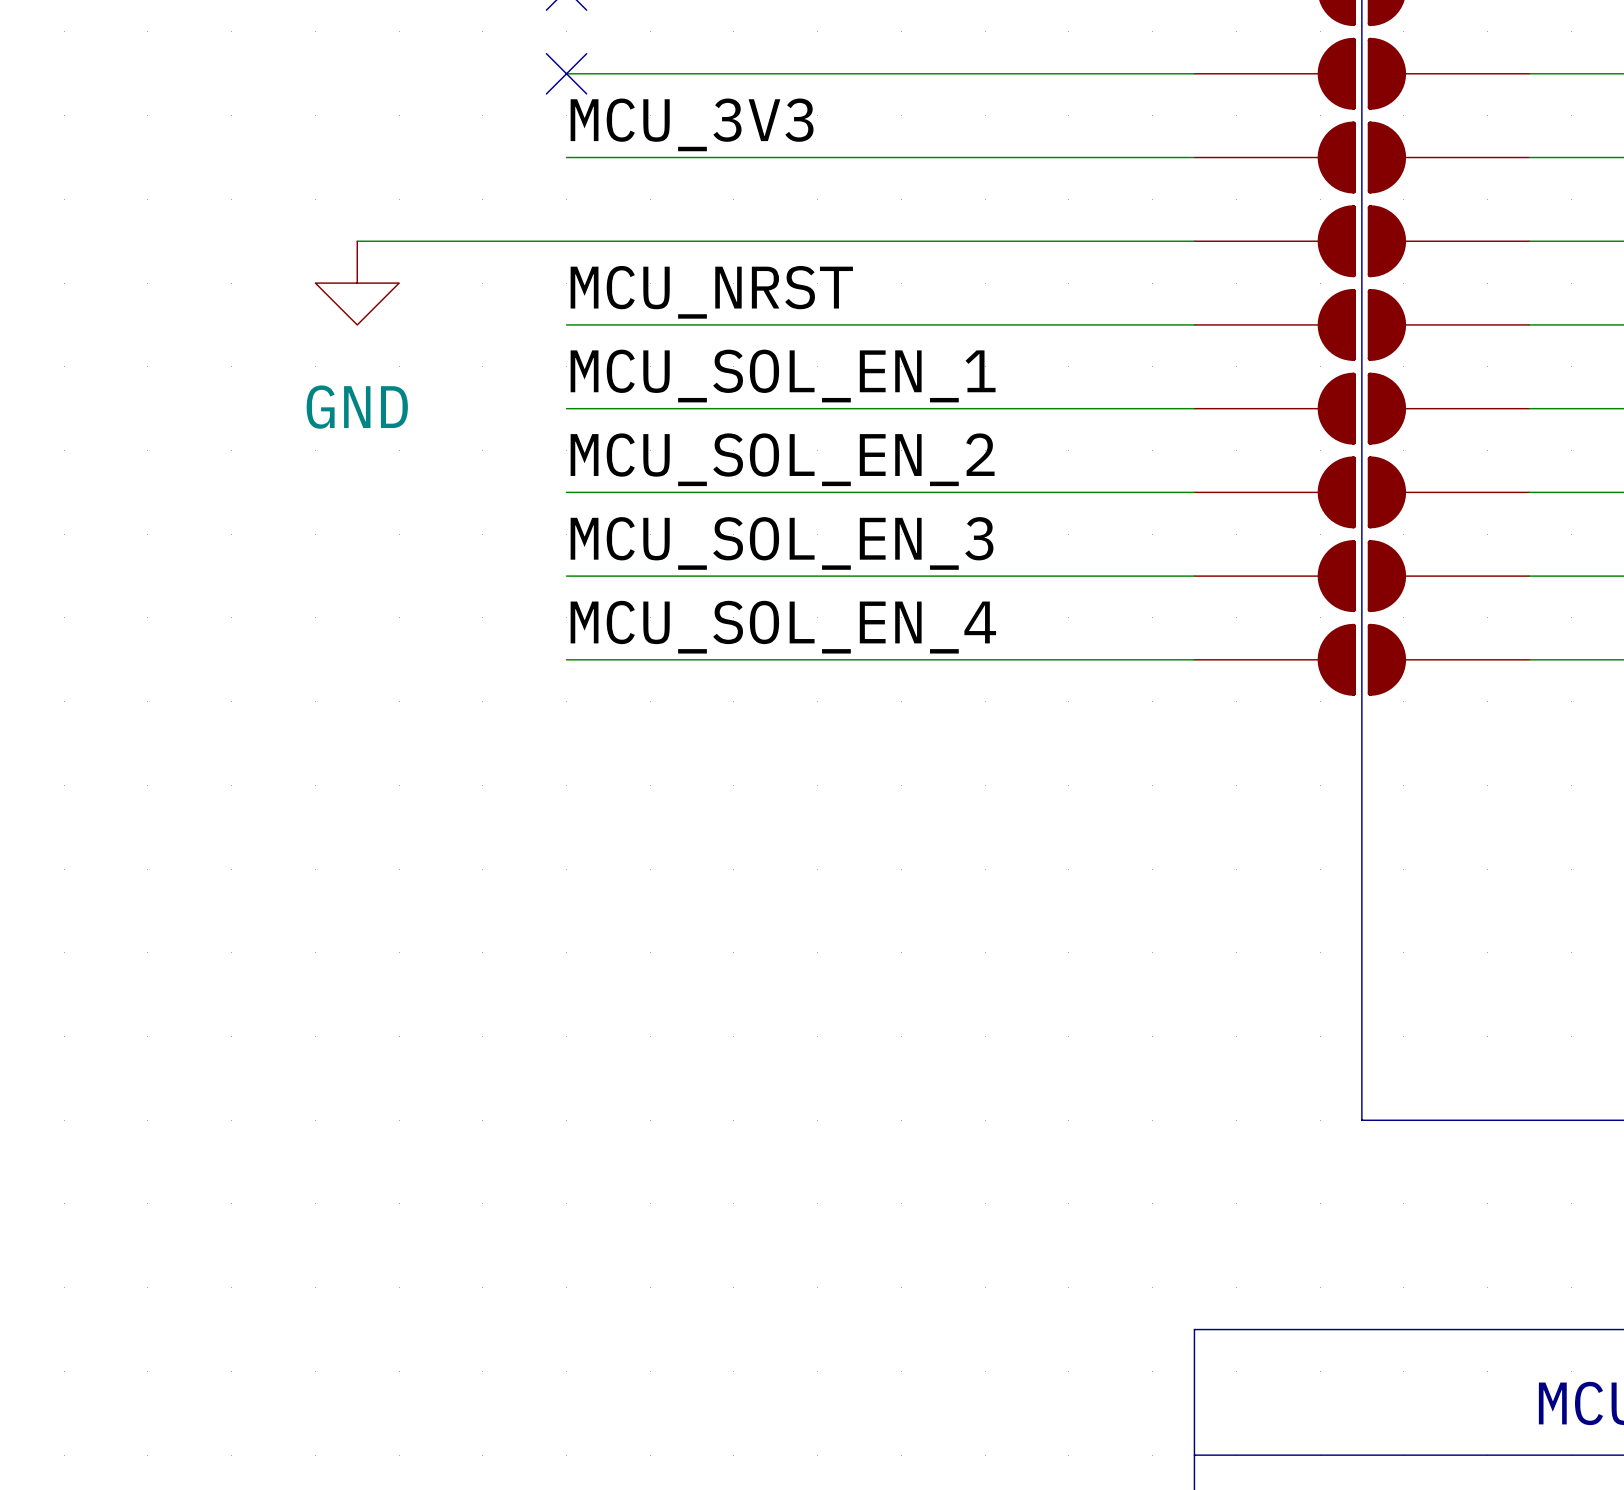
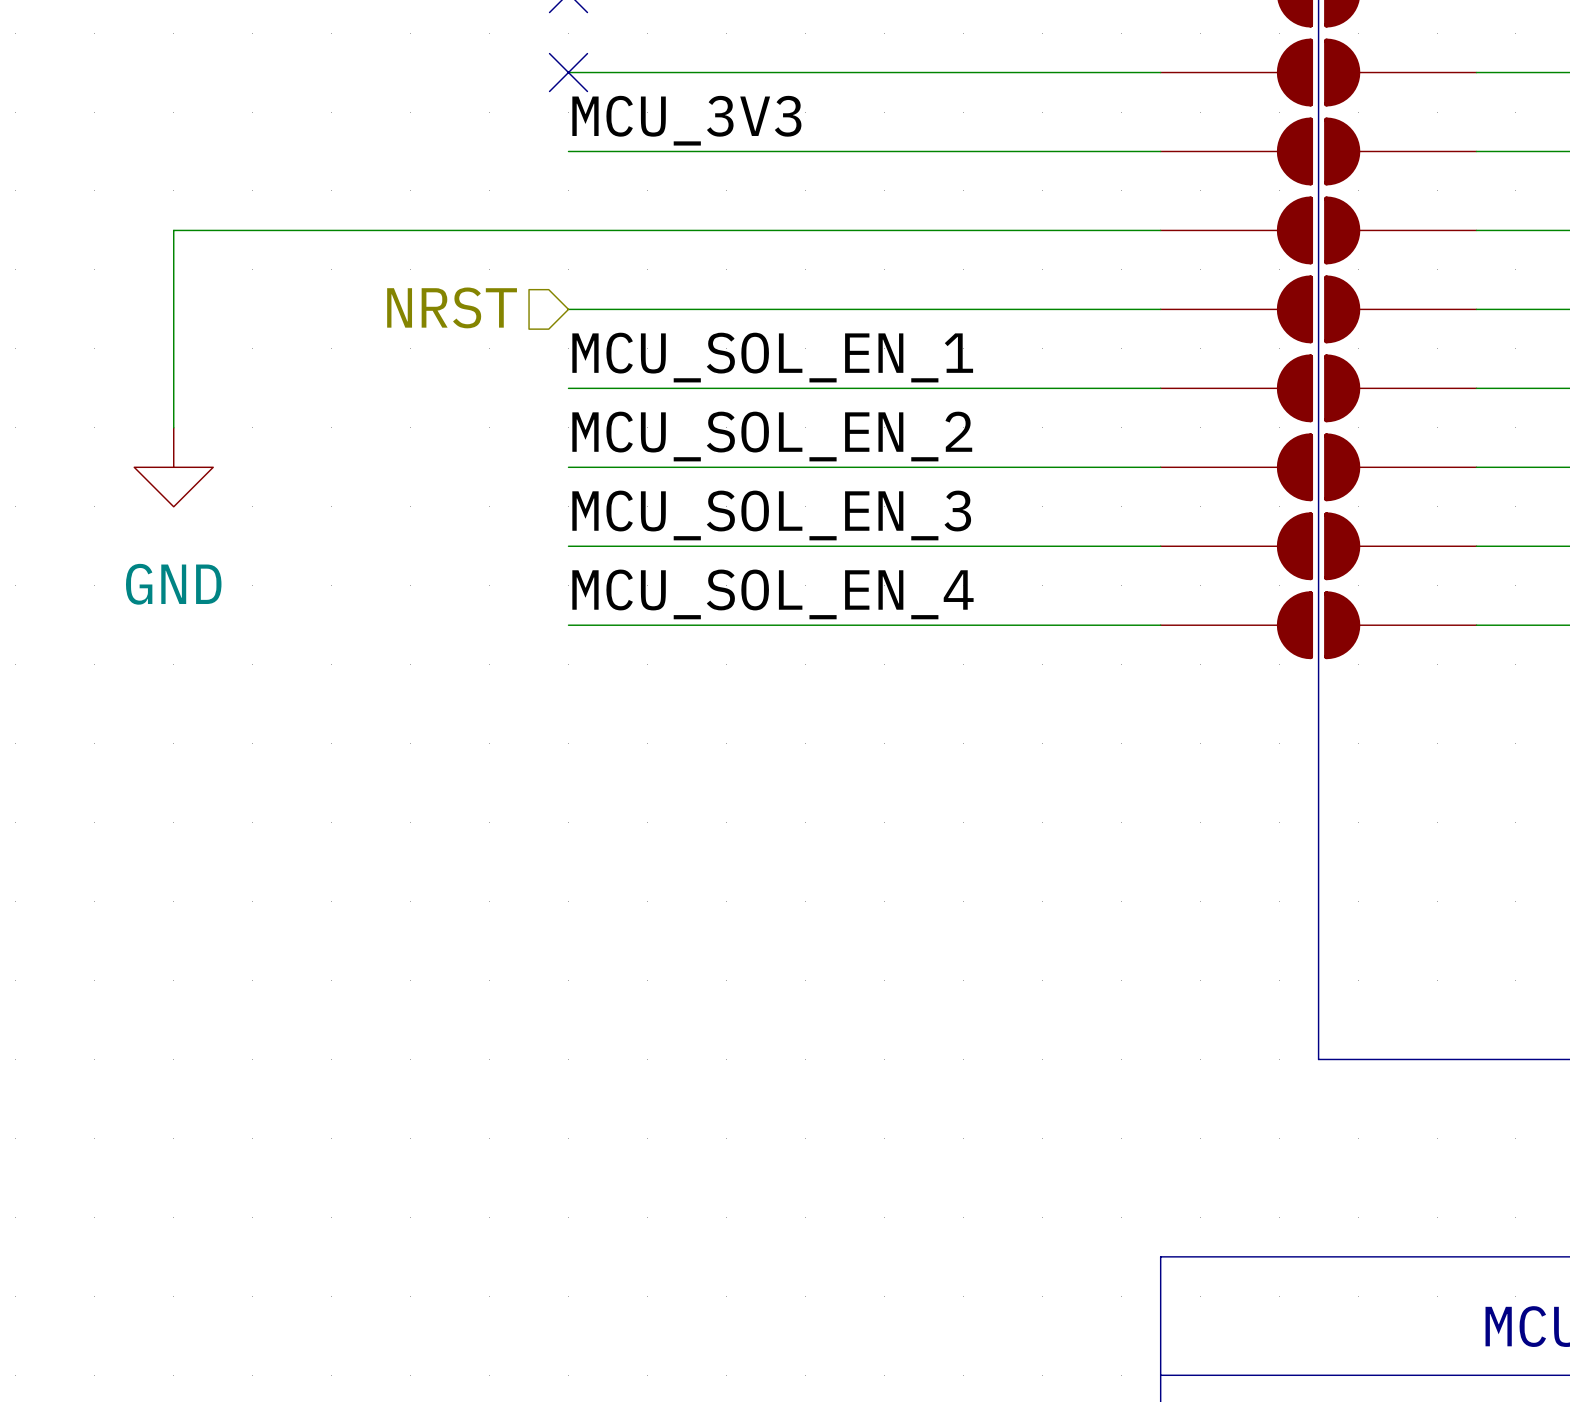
wire: none -> (371, 230) (173, 230) (173, 427)
power symbol position: GND (357, 283) -> GND (173, 467)
label: MCU_NRST (711, 292) -> none
hierarchical label: none -> NRST (452, 307)

